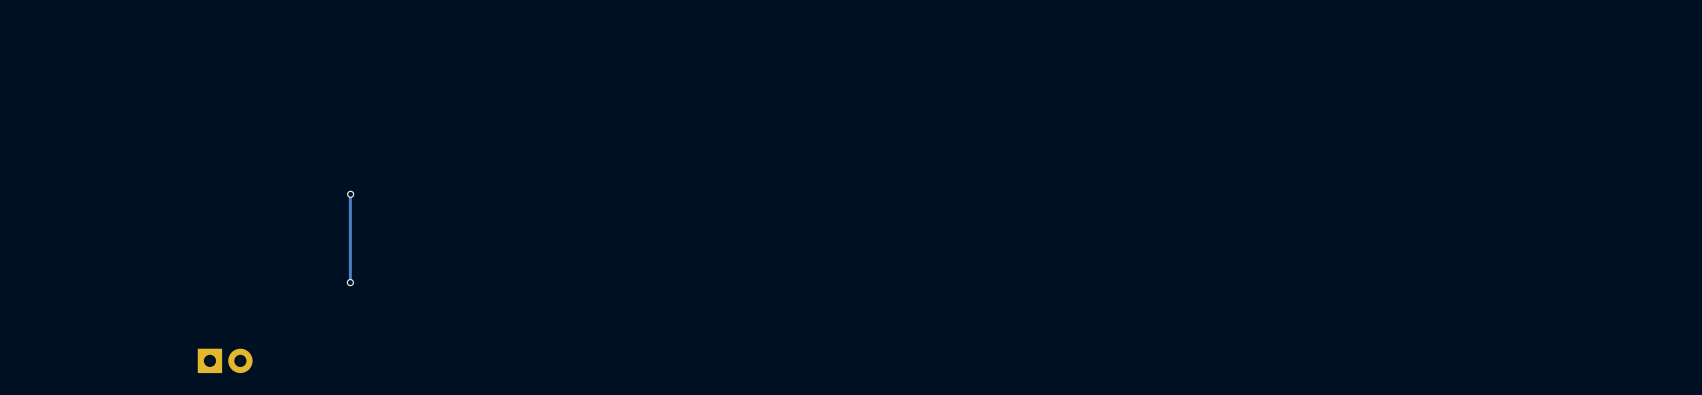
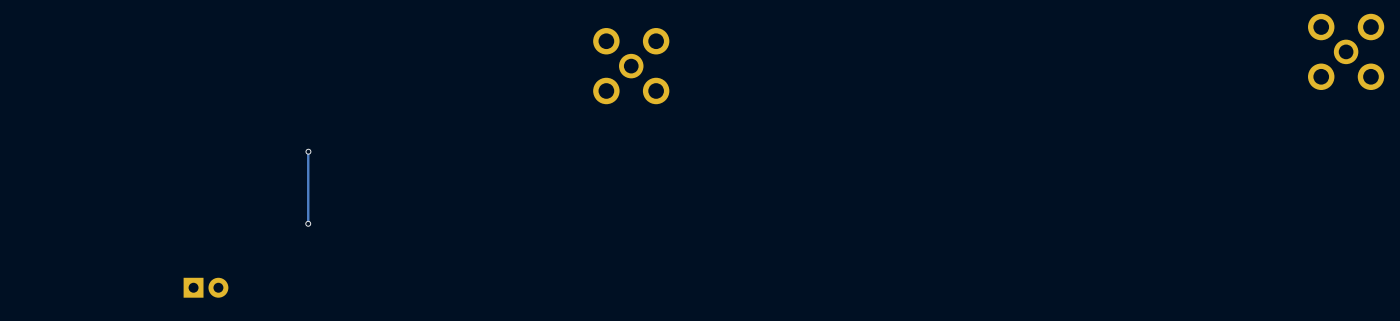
part: none -> (1346, 51)
part: none -> (631, 66)

